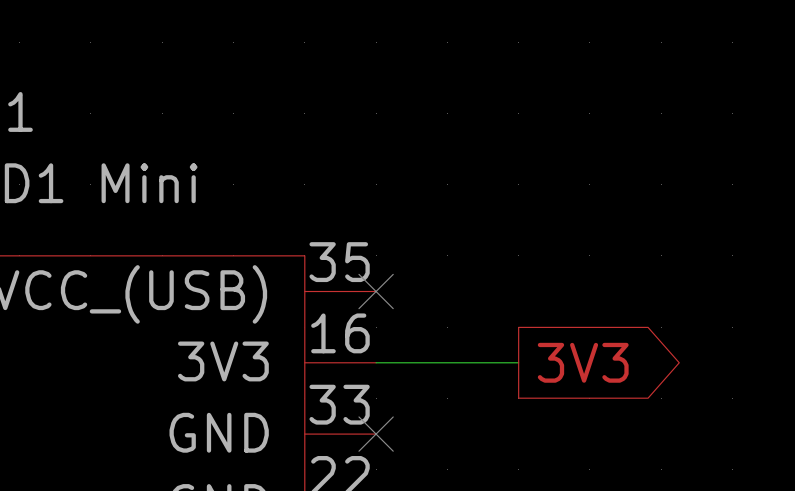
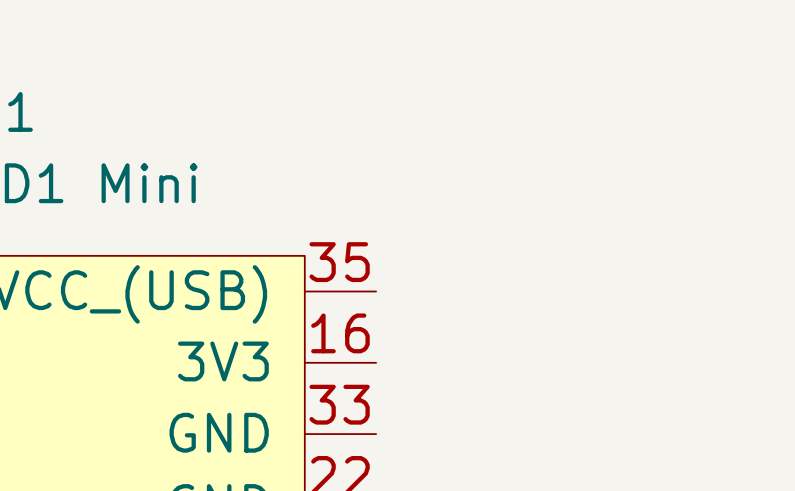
no-connect mark: (376, 291) -> none
wire: (376, 362) (518, 362) -> none
global label: 3V3 (583, 362) -> none
no-connect mark: (376, 434) -> none

